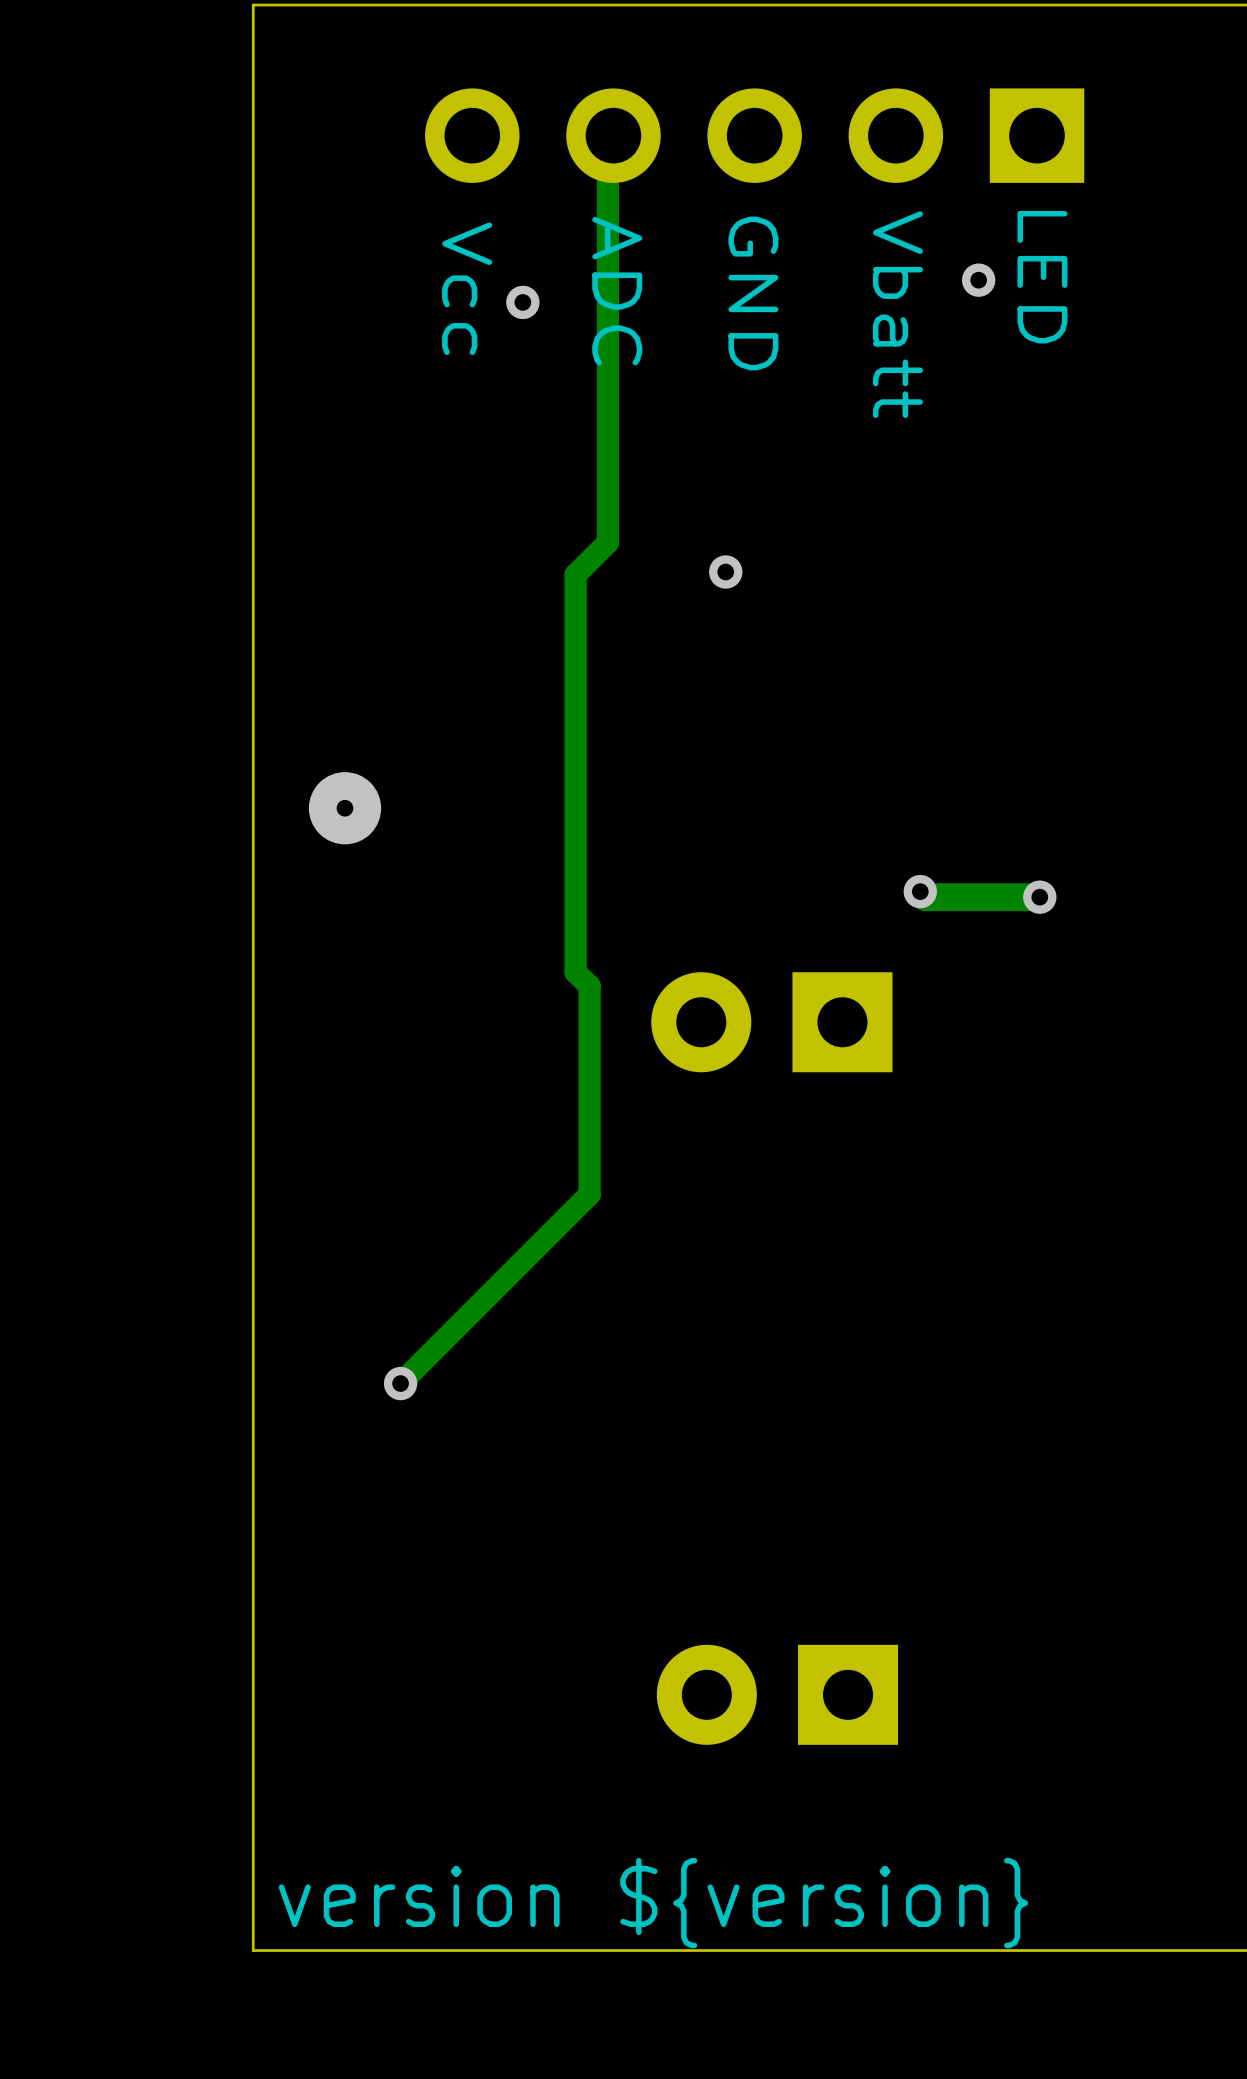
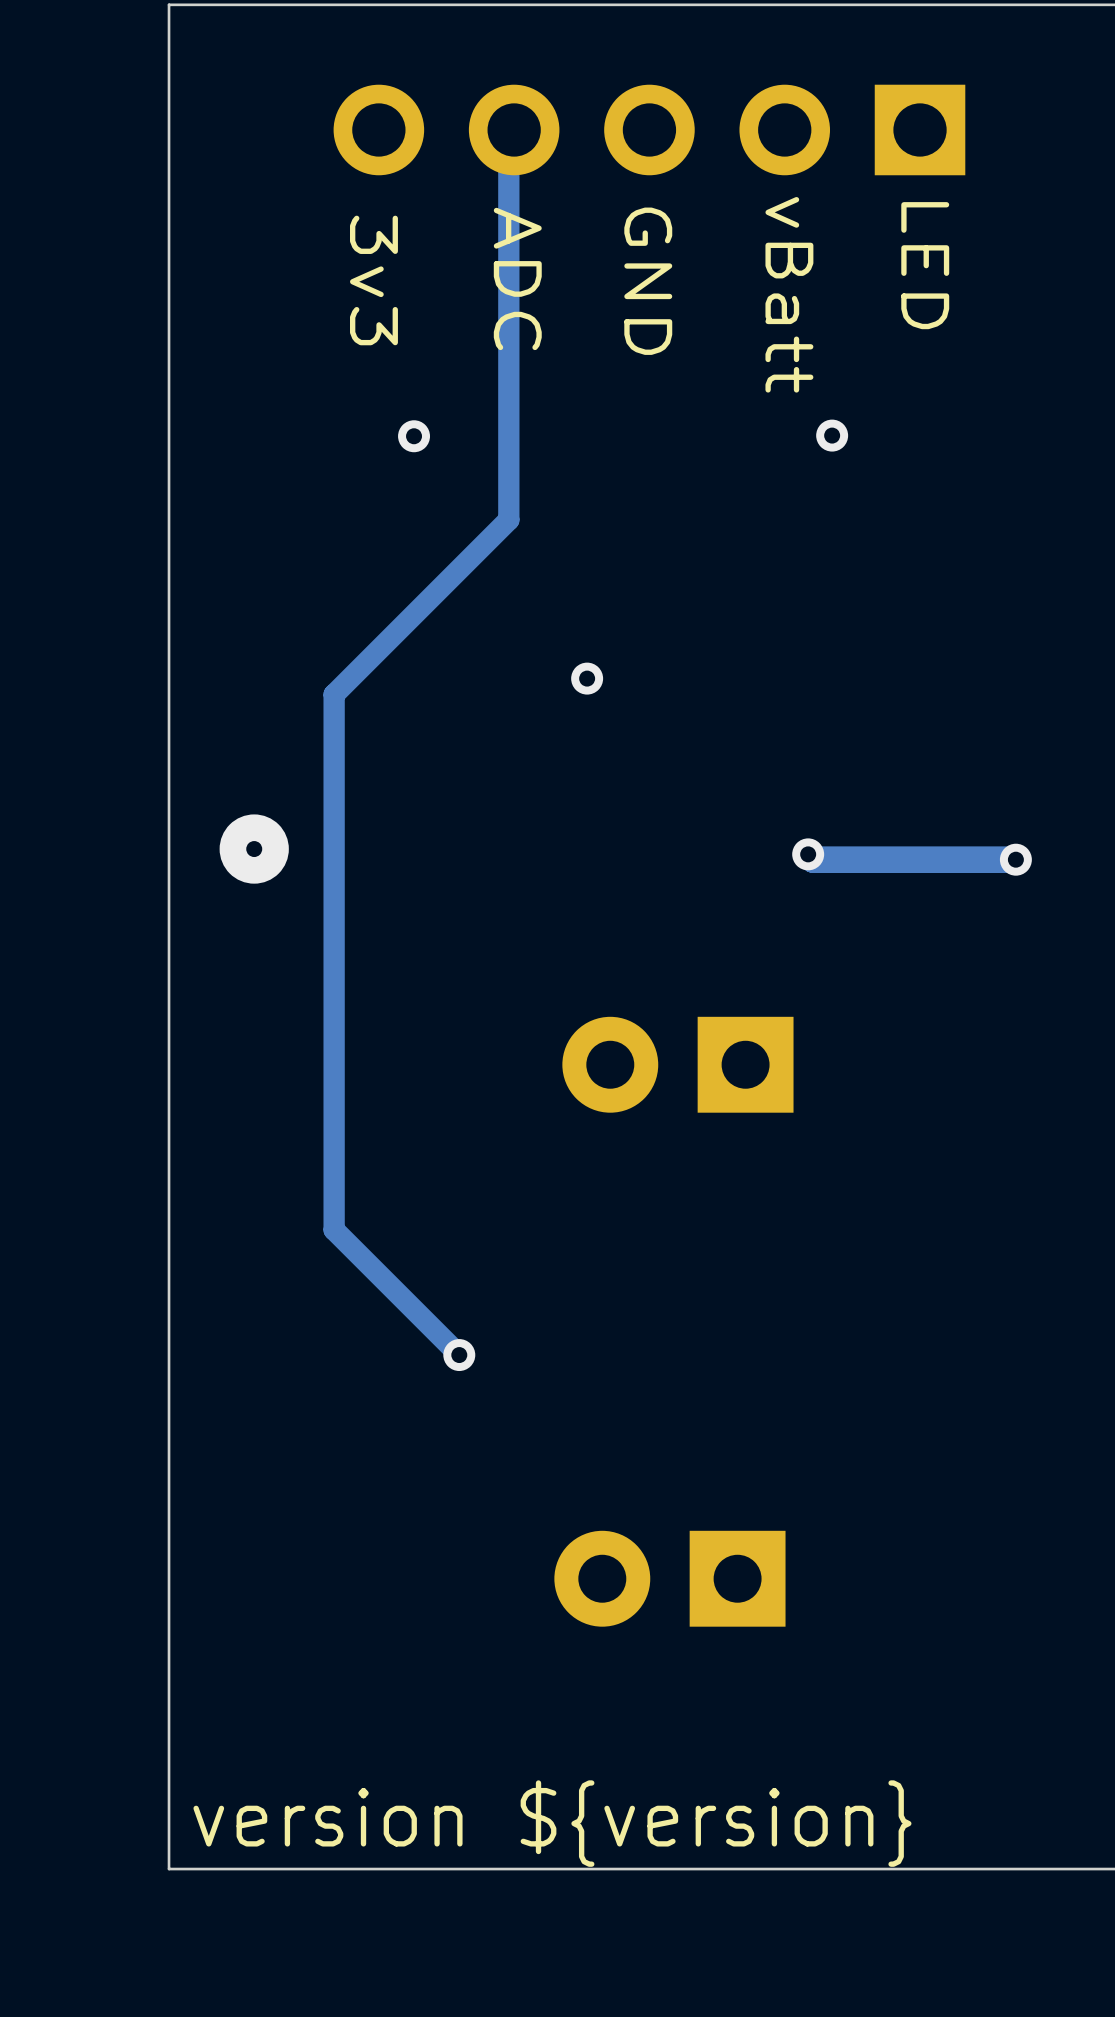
via: (978, 280) -> none
text: Vcc (467, 288) -> 3v3 (373, 280)
via: (522, 302) -> none
text: Vbatt (897, 314) -> vBatt (789, 294)
via: none -> (832, 435)
via: none -> (414, 436)
via: (725, 572) -> none
track: (575, 574) (575, 972) (589, 986) (589, 1194) (400, 1383) -> (477, 550) (334, 694) (334, 1229) (459, 1355)
via: none -> (587, 678)
via position: (344, 808) -> (254, 849)
via position: (1039, 897) -> (1015, 859)
track: none -> (1015, 859) (922, 859)
part position: (771, 1022) -> (677, 1064)
via position: (400, 1383) -> (459, 1355)
part position: (777, 1694) -> (669, 1578)

